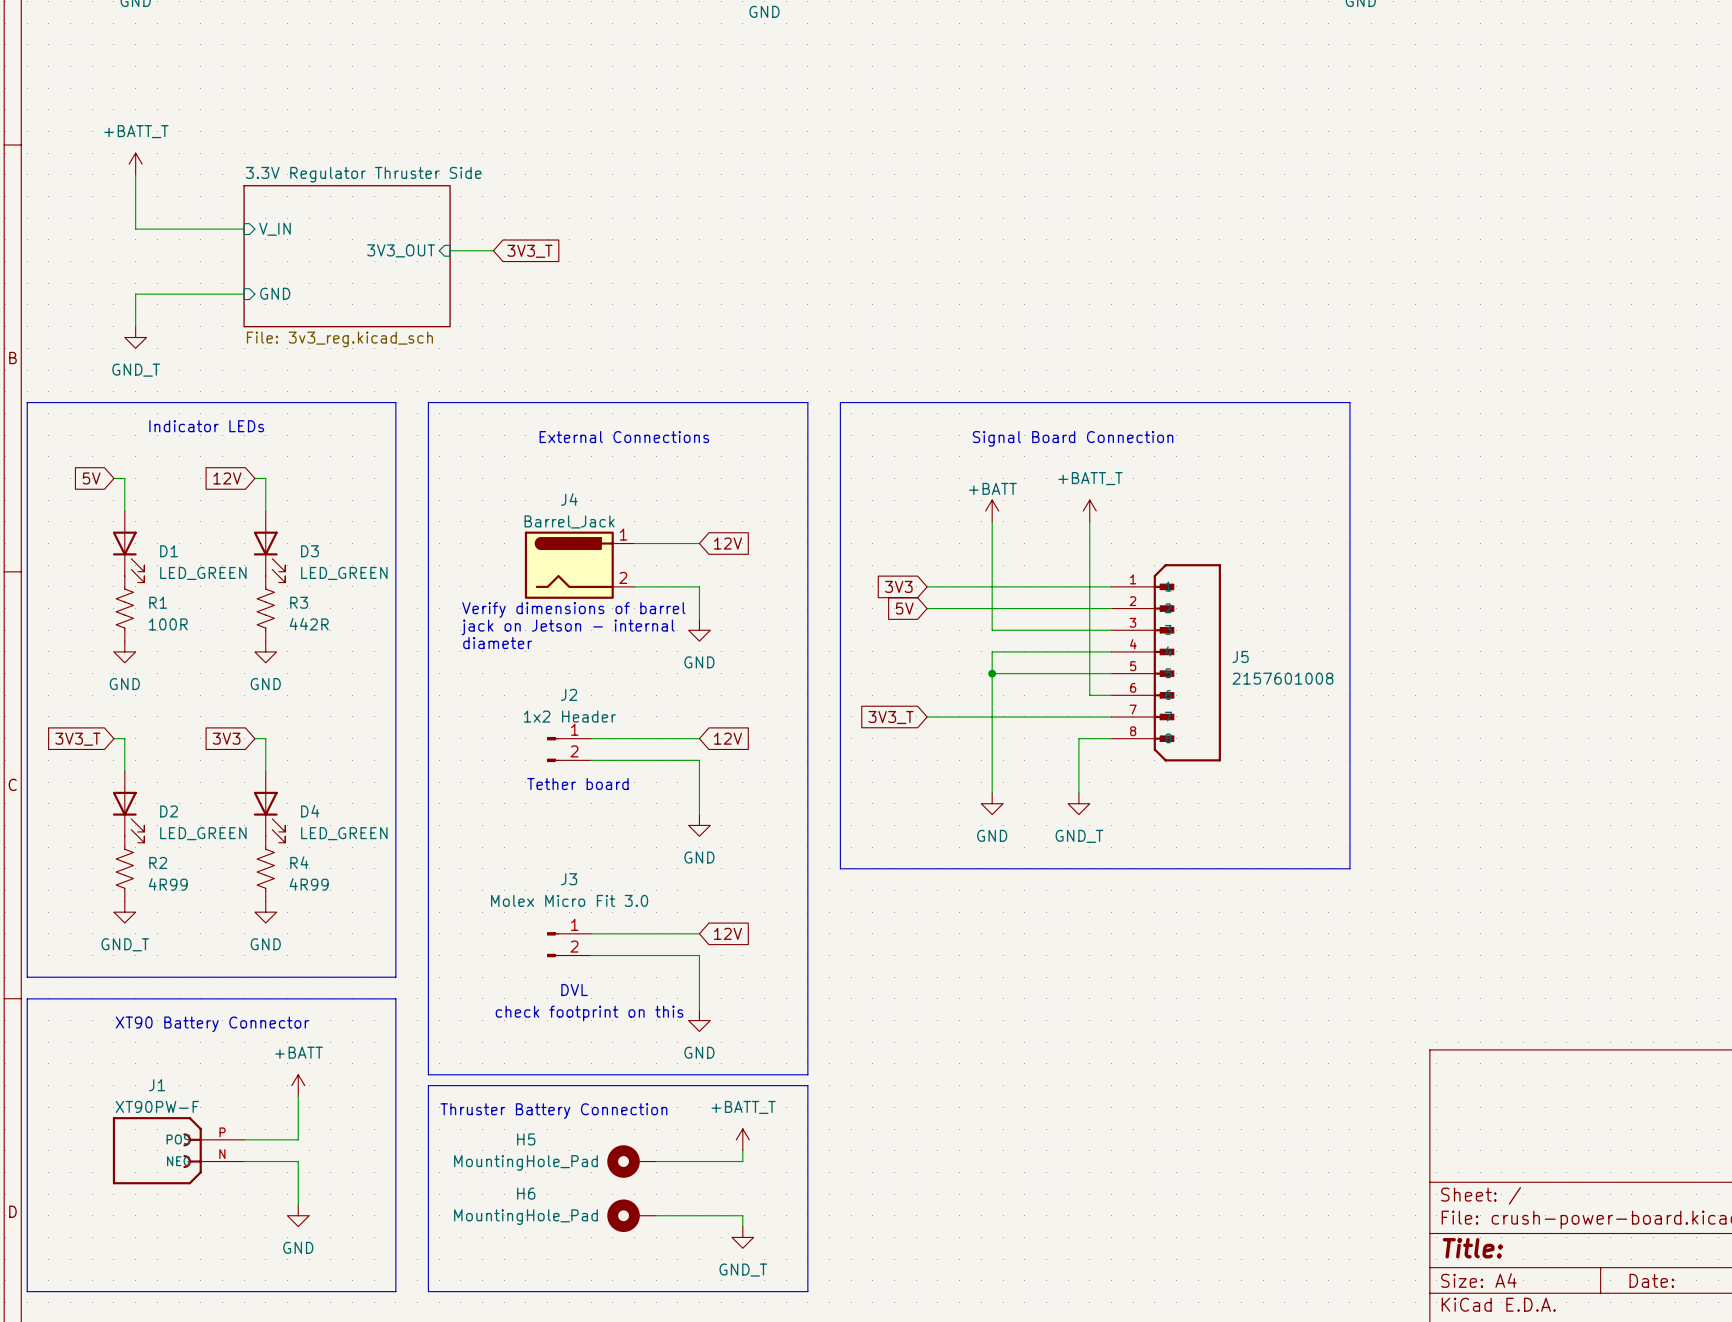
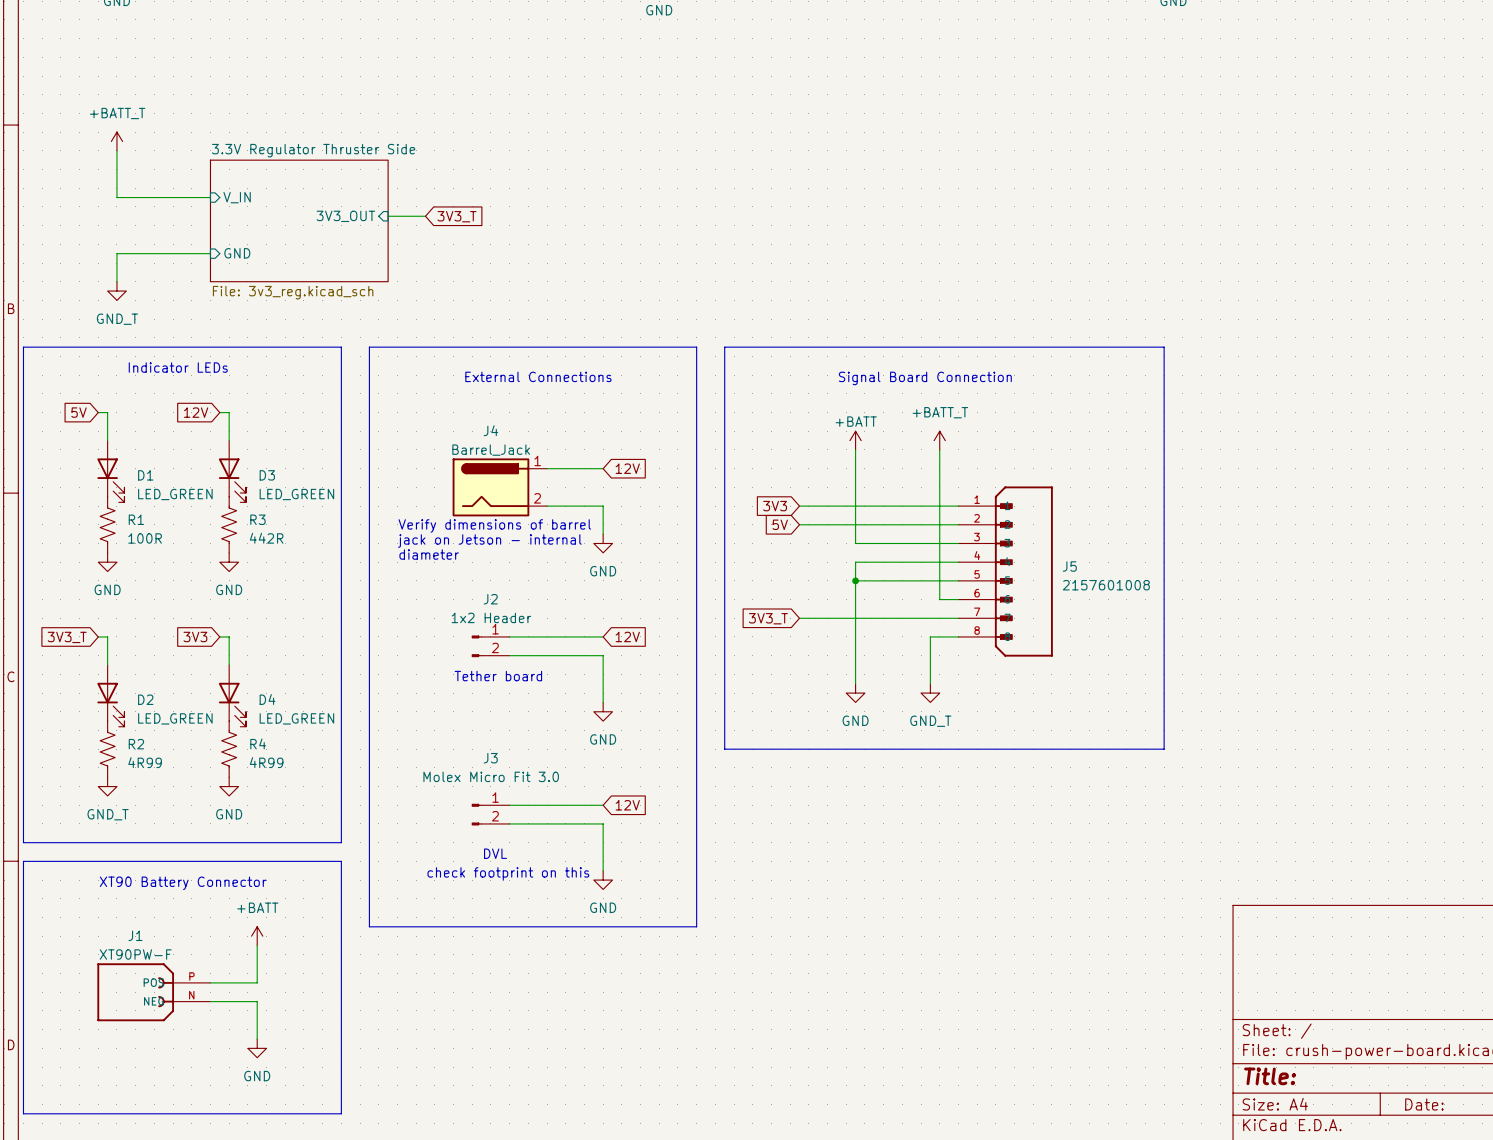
line: (428, 1085) (807, 1085) (807, 1291) (428, 1291) (428, 1085) -> none
text: Thruster Battery Connection (553, 1111) -> none
power symbol: +BATT_T (742, 1139) -> none
wire: (742, 1150) (742, 1161) (656, 1161) -> none
H5: MountingHole_Pad (631, 1161) -> none
H6: MountingHole_Pad (631, 1215) -> none
wire: (656, 1215) (742, 1215) (742, 1226) -> none
power symbol: GND_T (742, 1237) -> none

